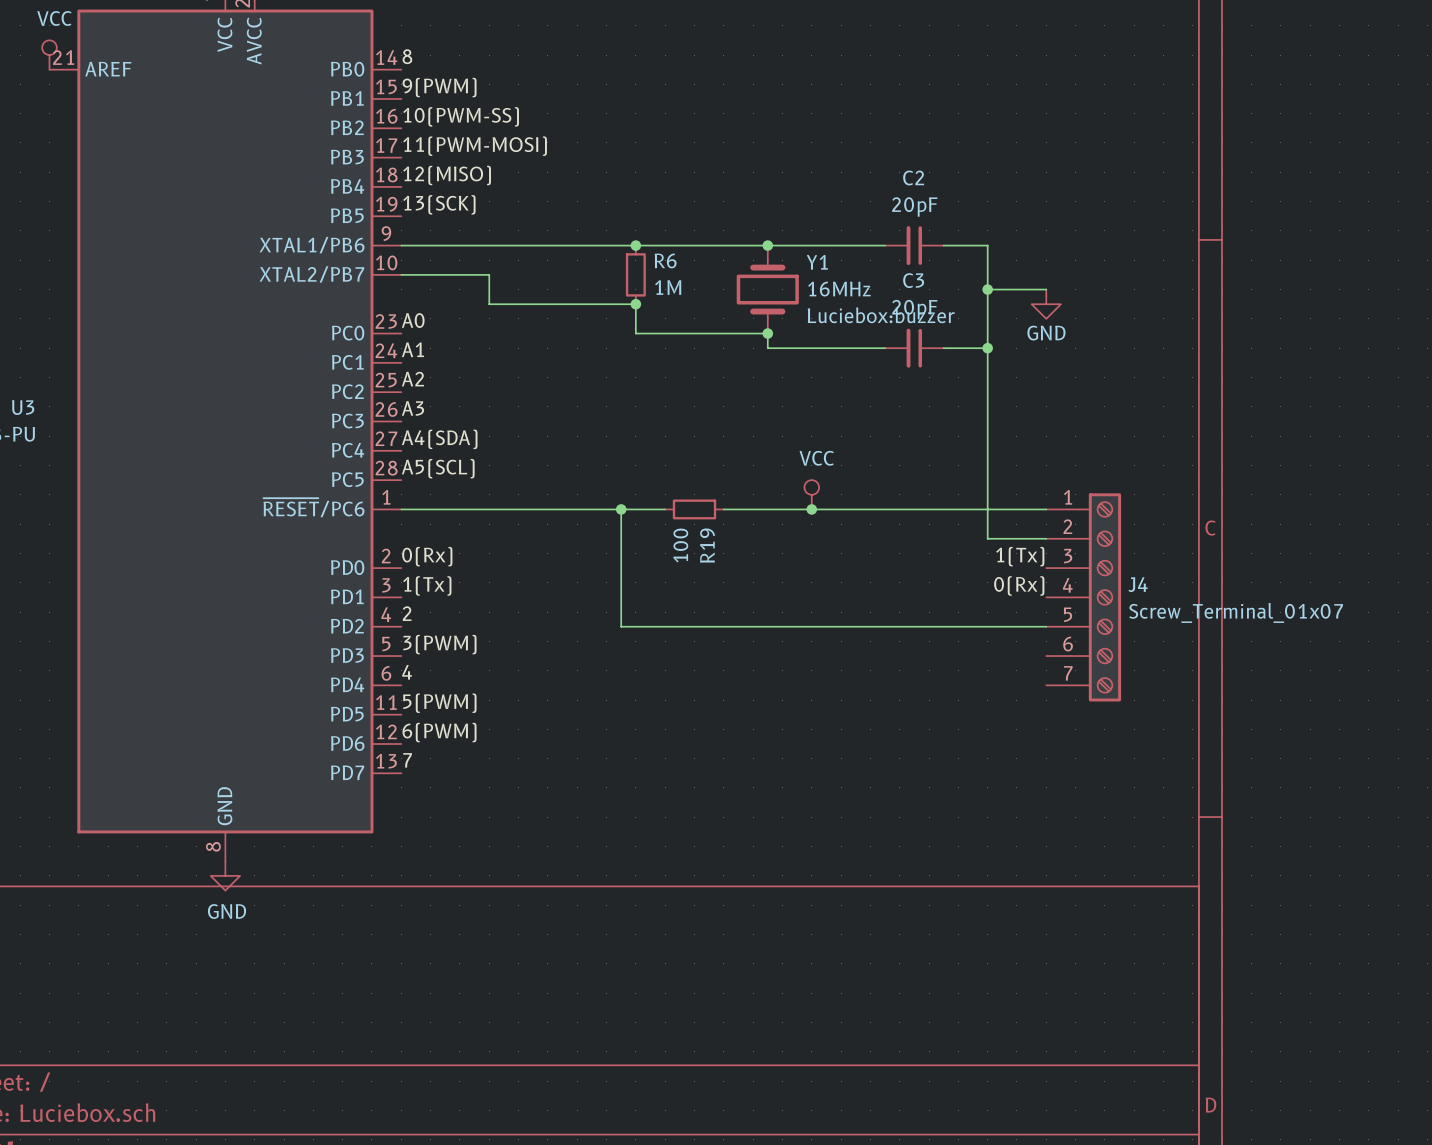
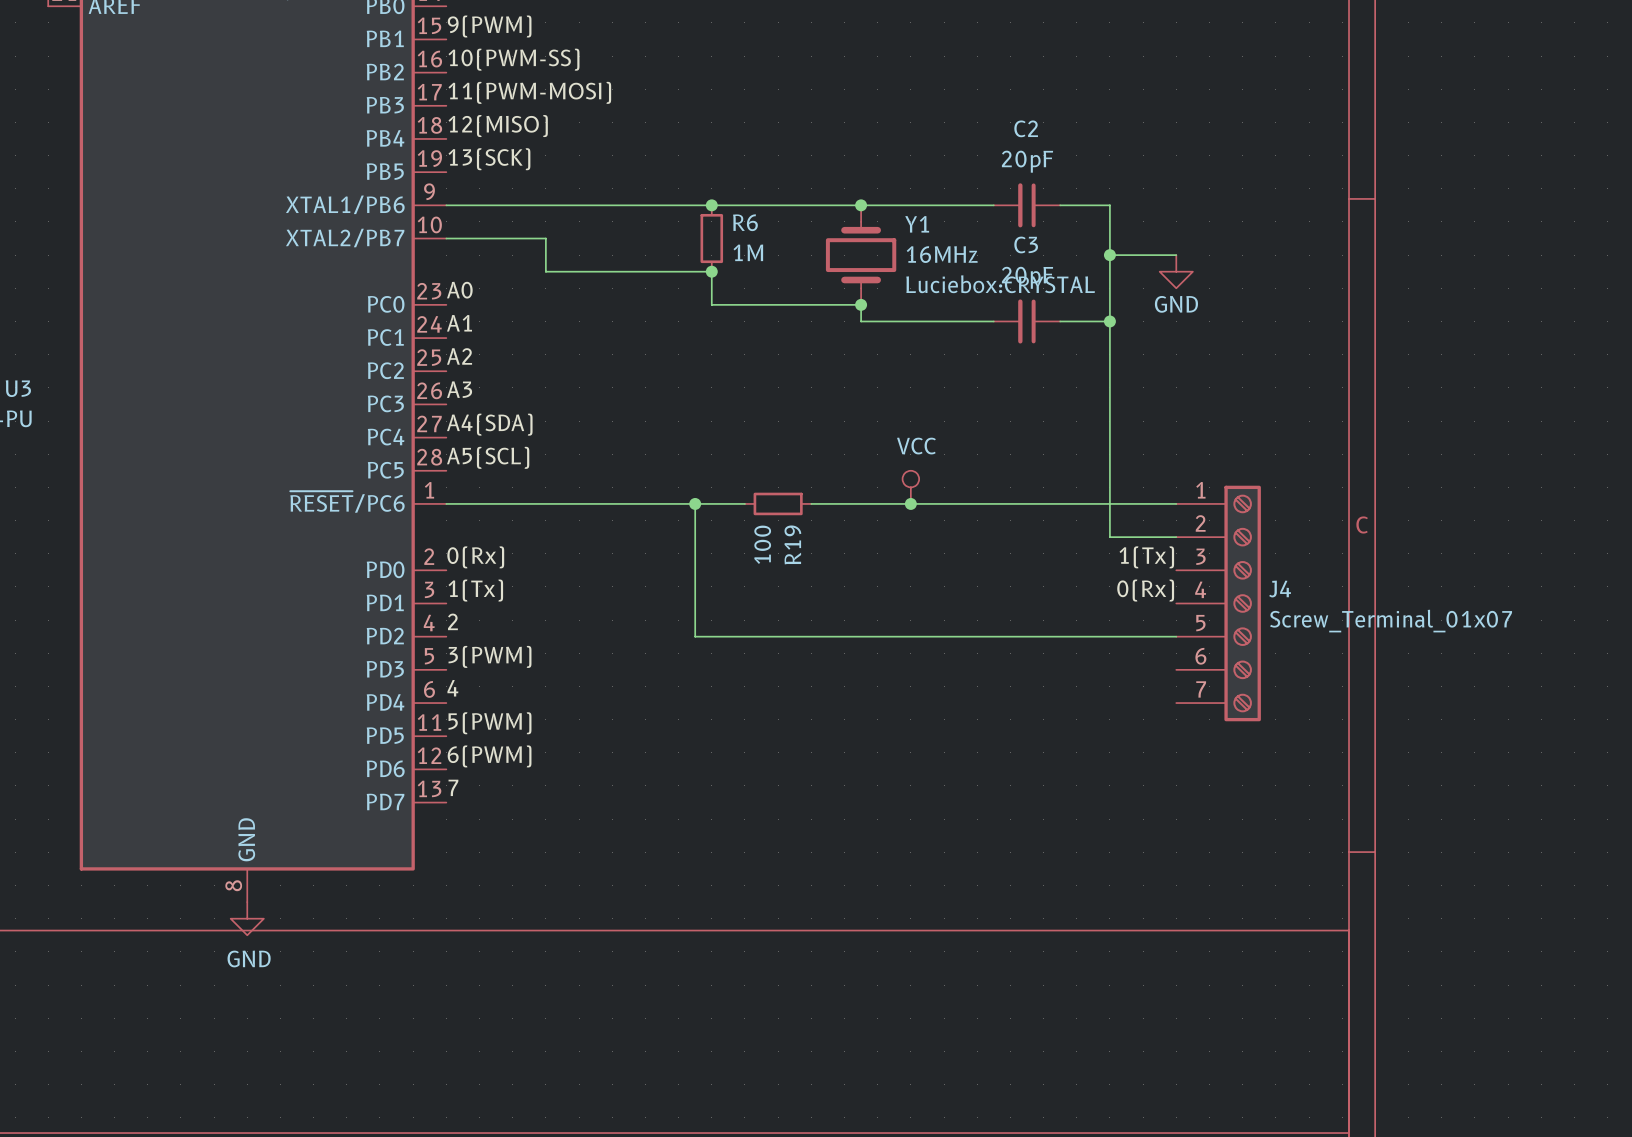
Y1 text: Luciebox:buzzer (881, 315) -> Luciebox:CRYSTAL (1000, 284)

